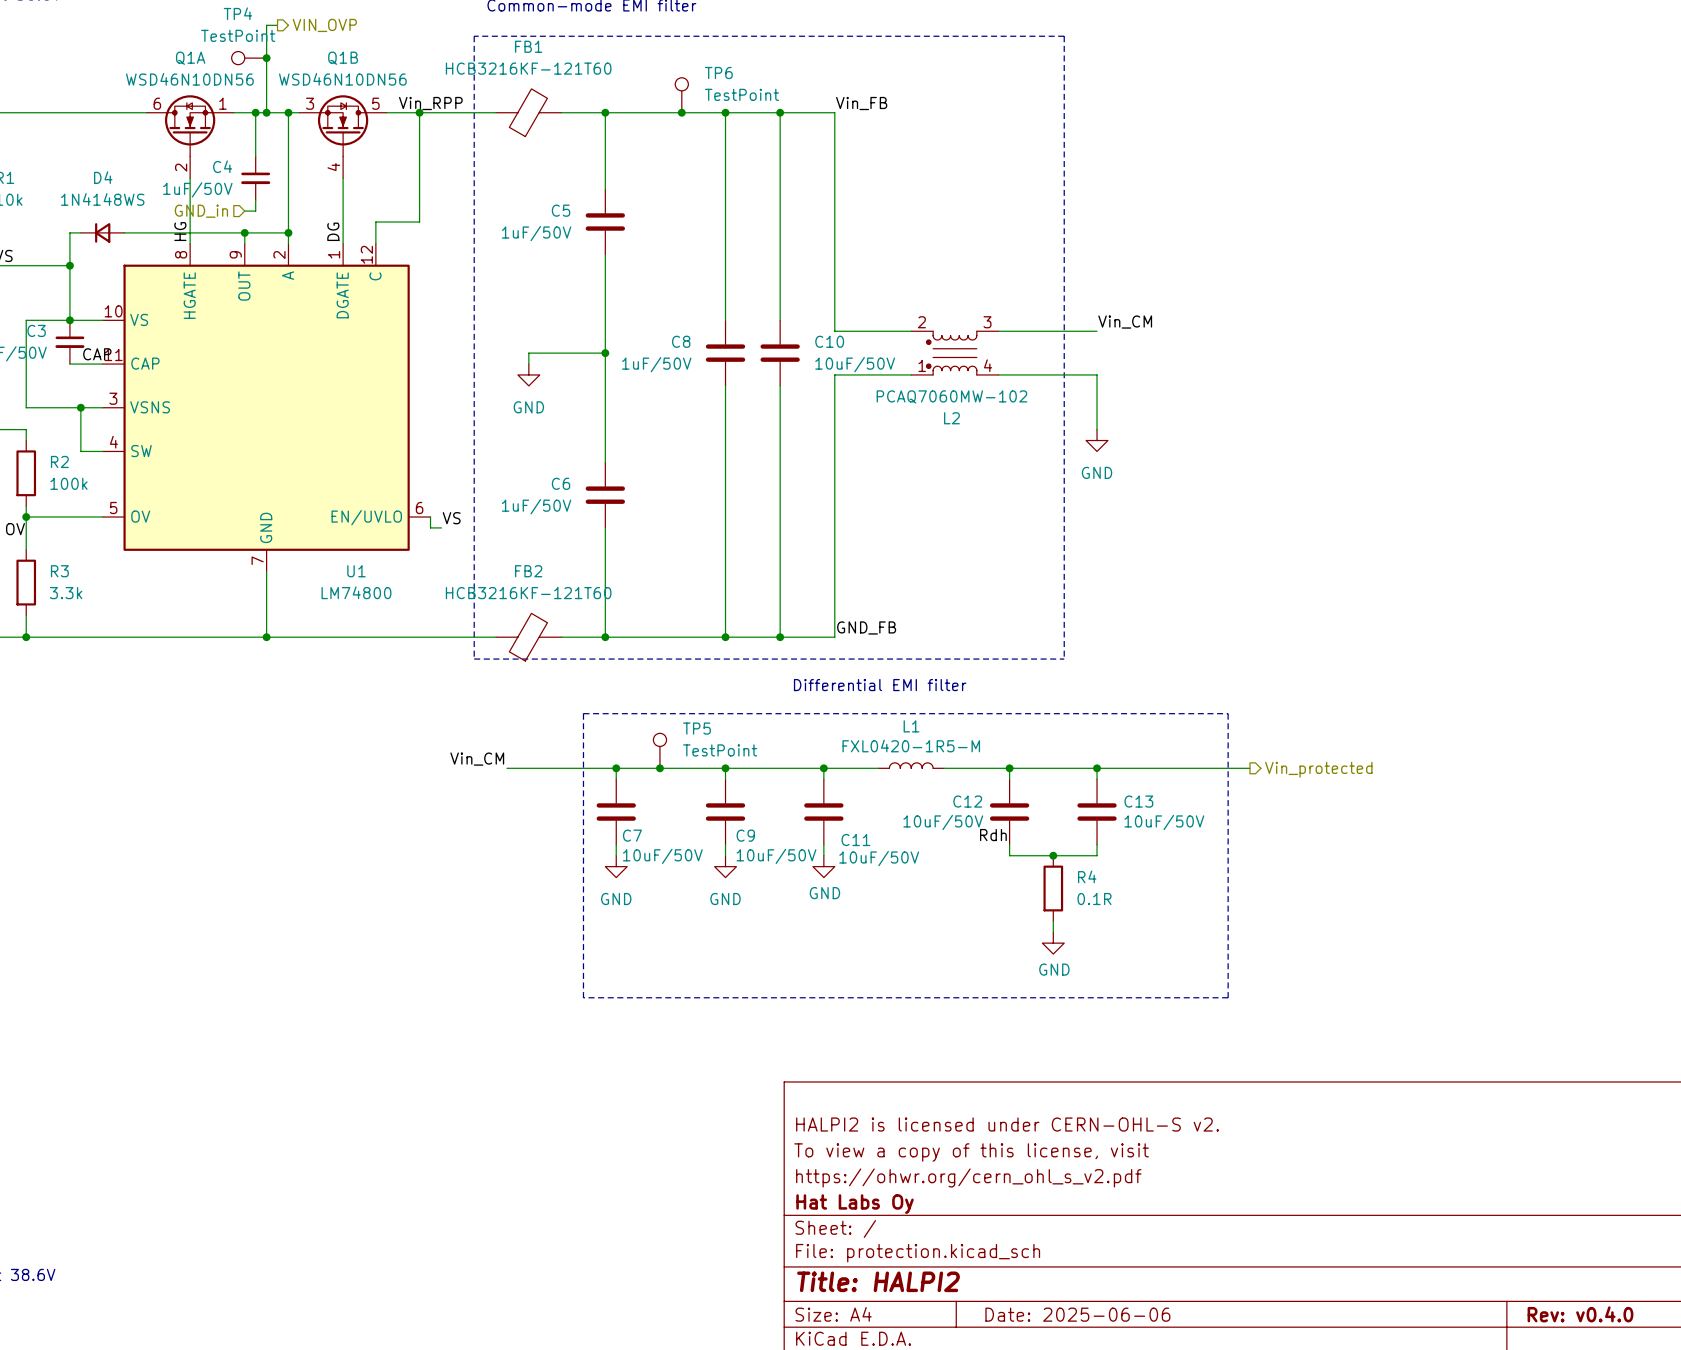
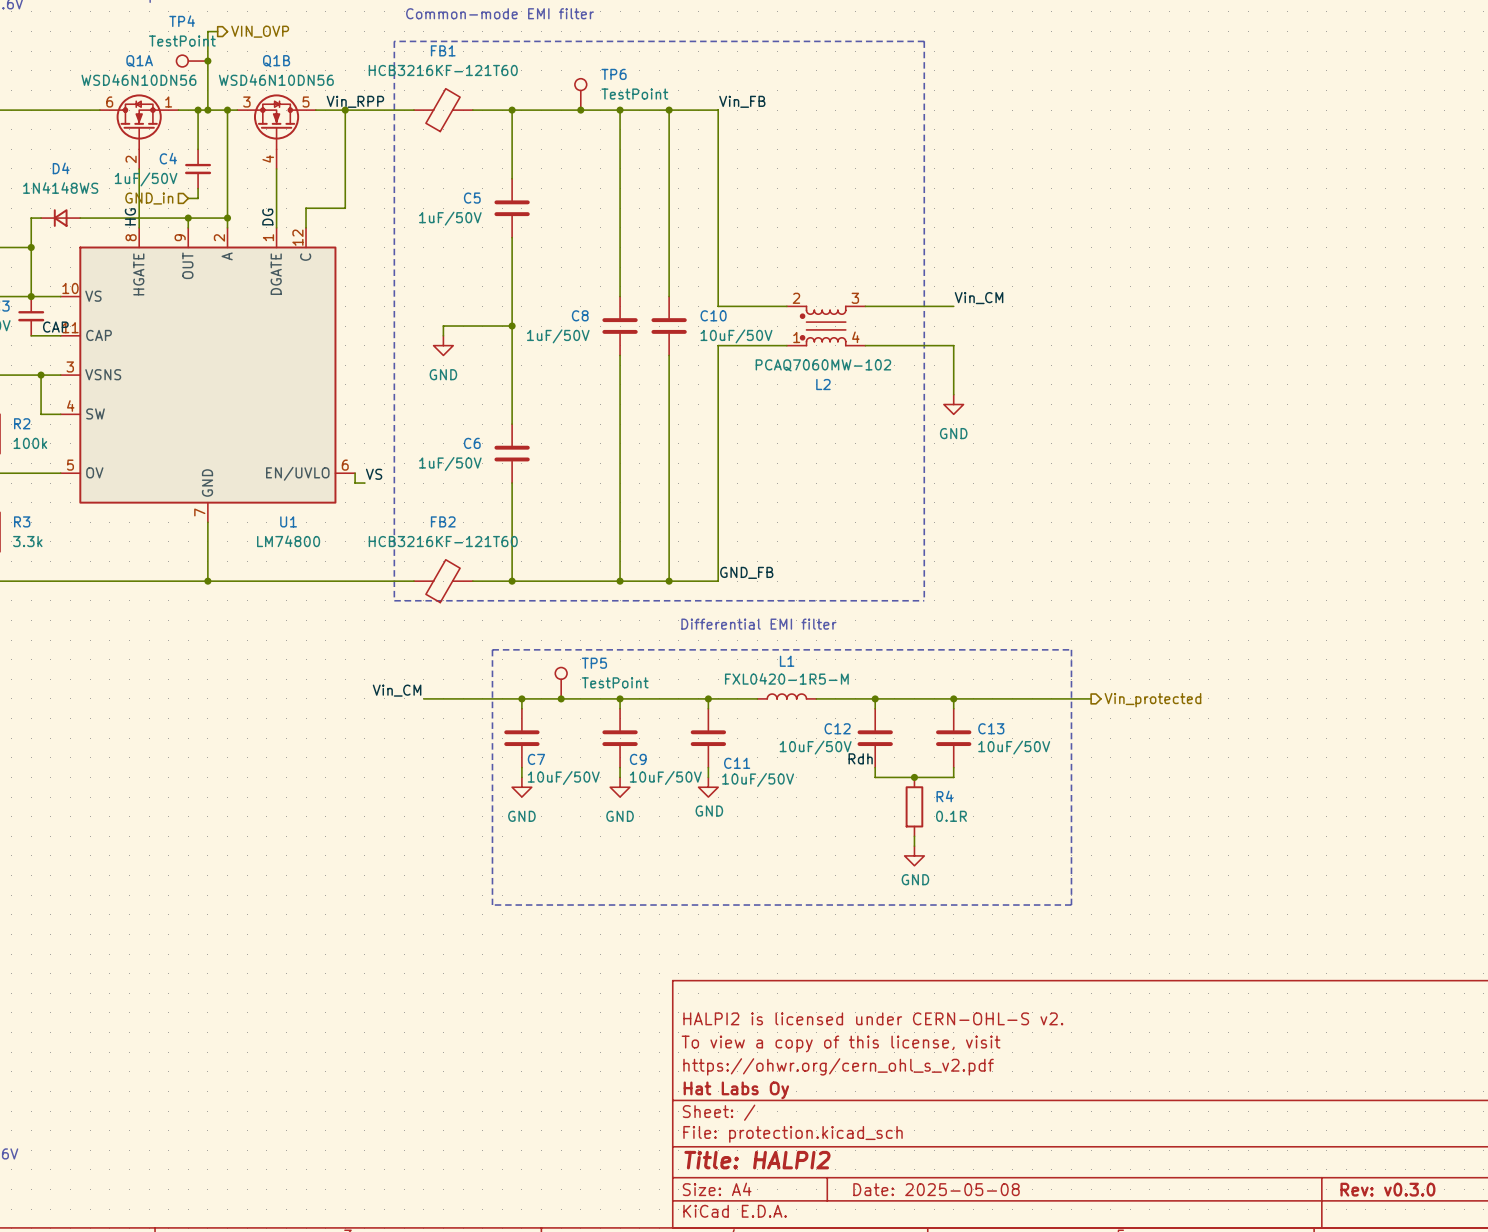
title block: Date: 2025-06-06 (1077, 1314) -> Date: 2025-05-08 (936, 1189)
title block: Rev: v0.4.0 (1580, 1314) -> Rev: v0.3.0 (1387, 1189)

